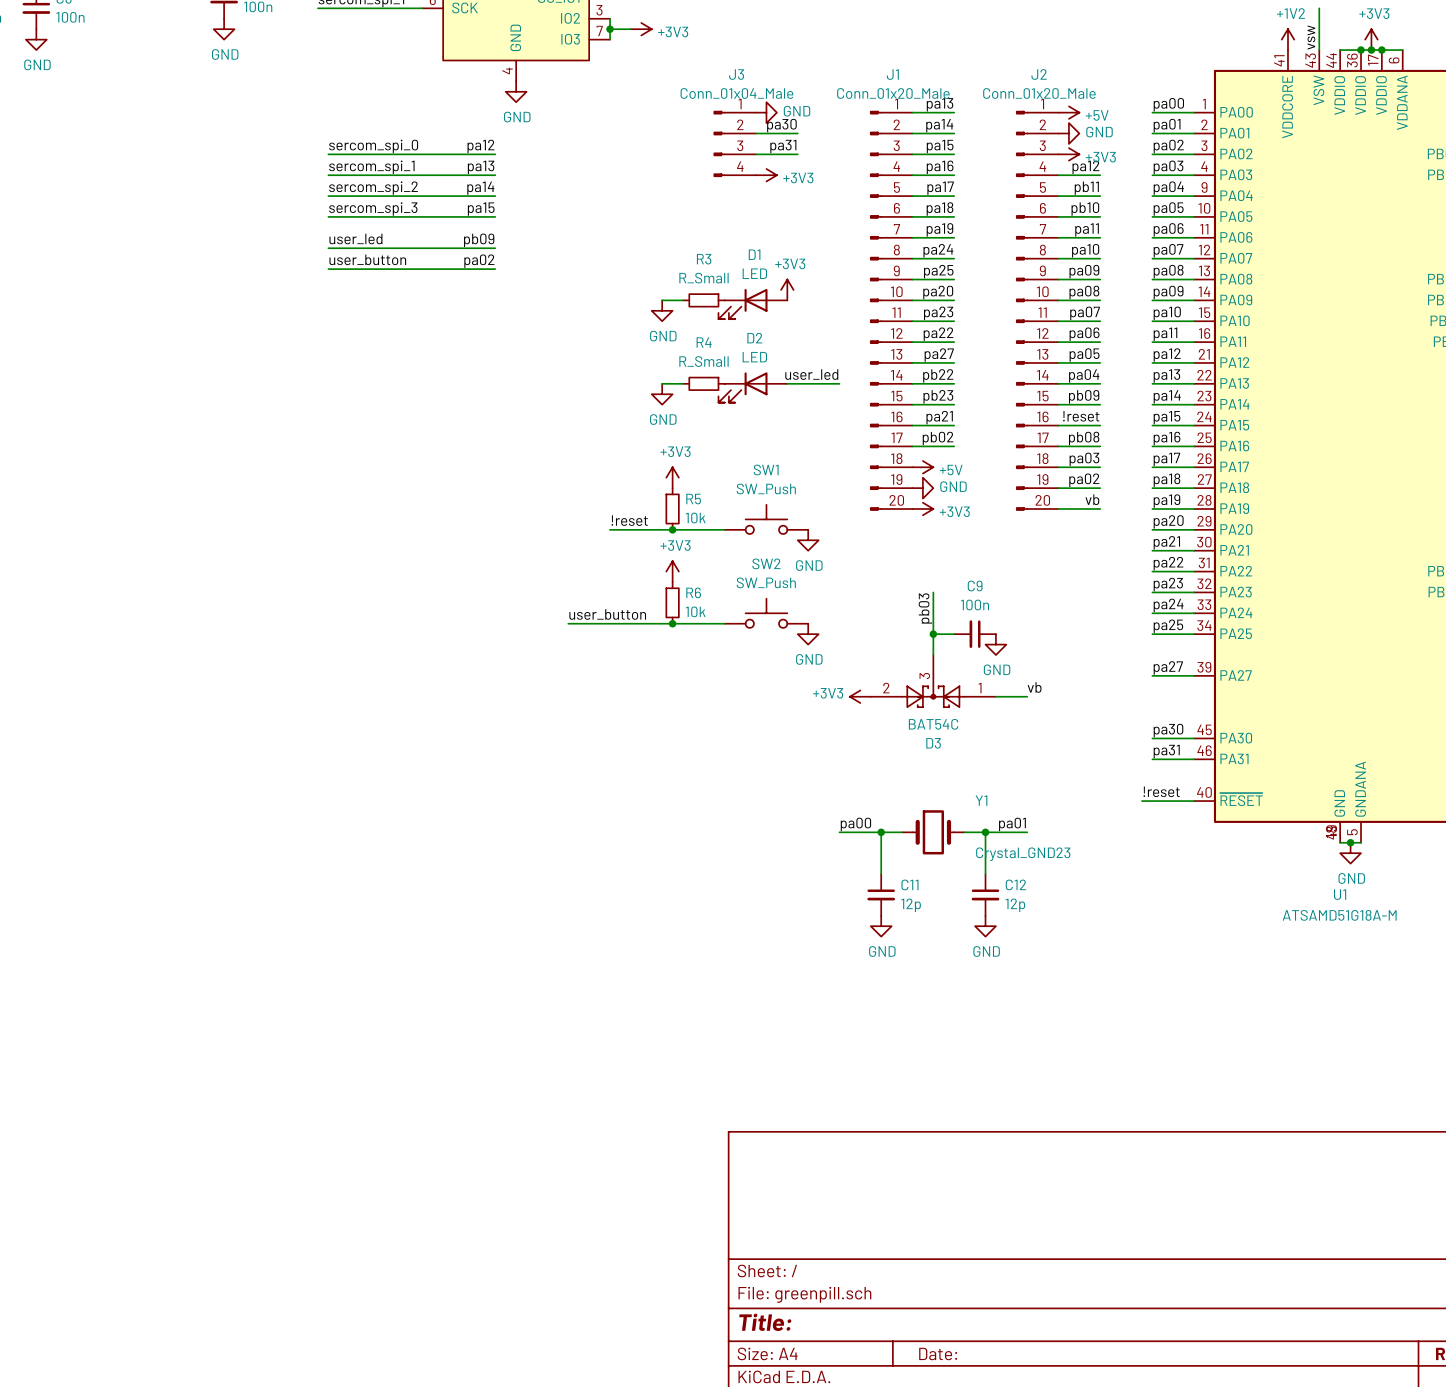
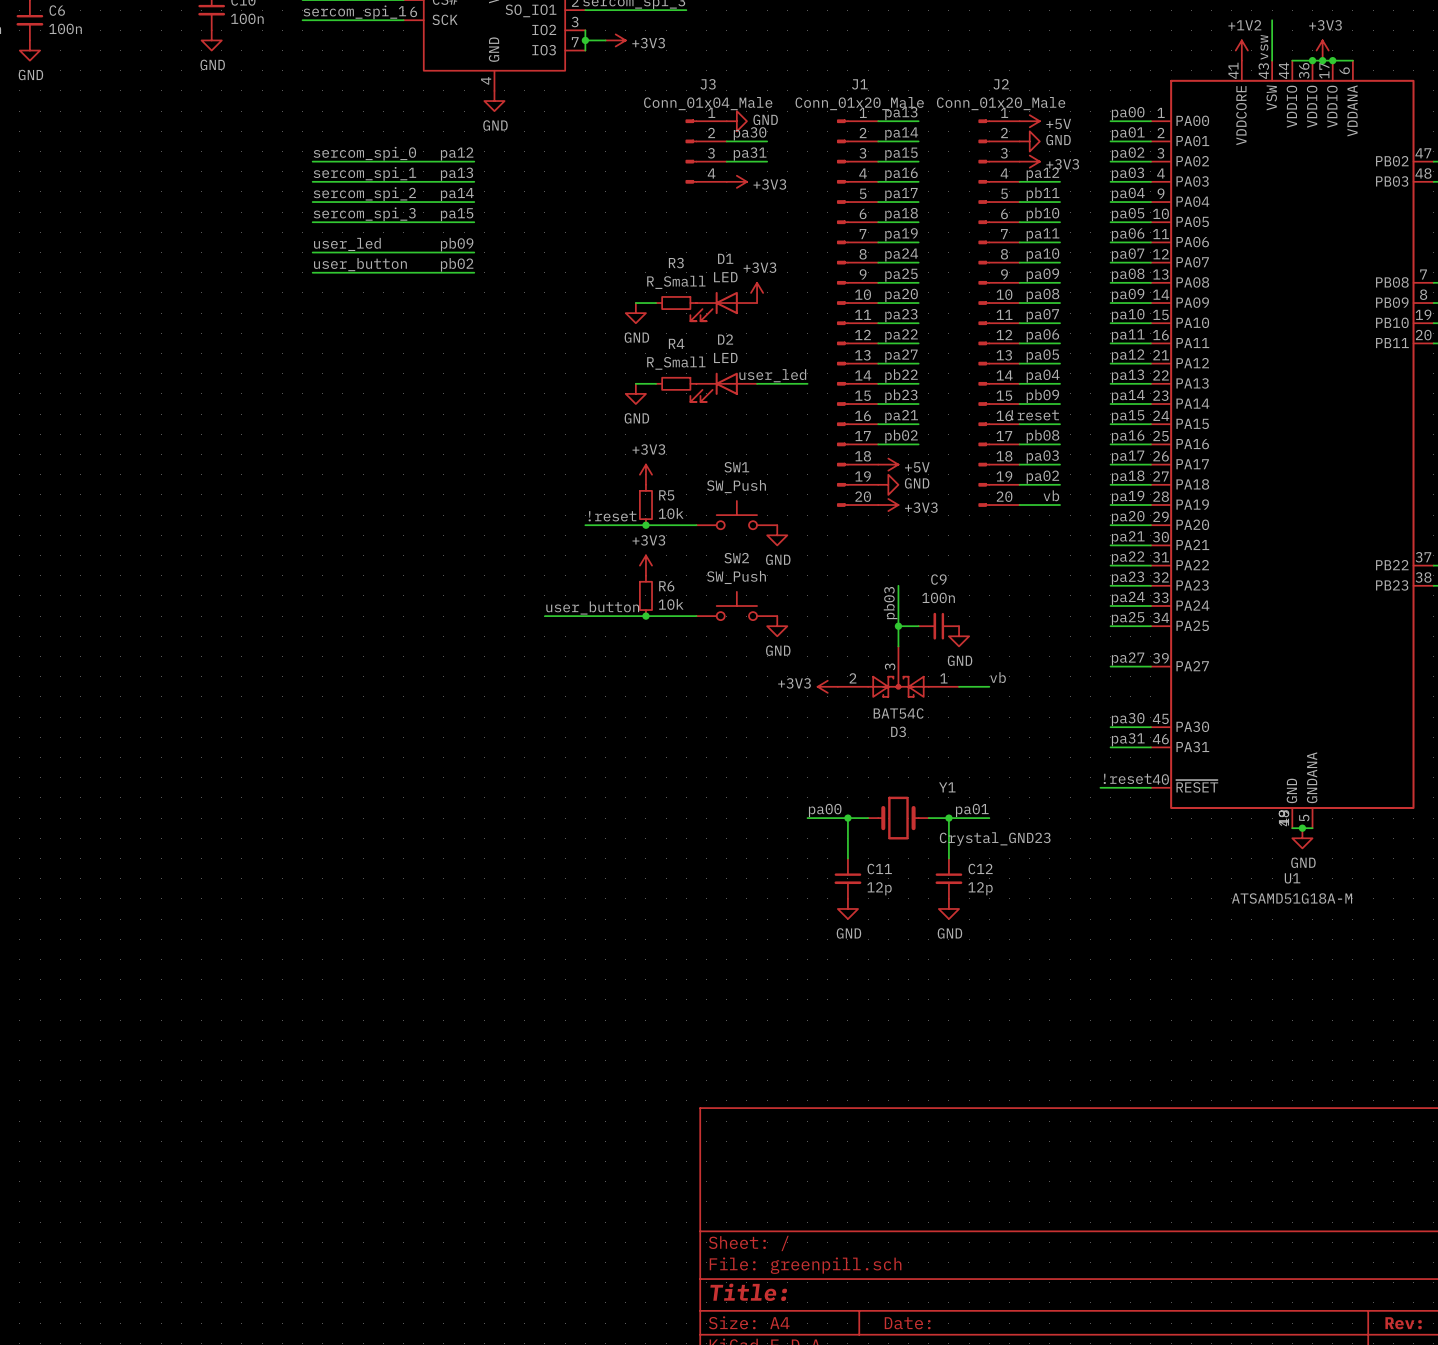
label: pa02 (479, 261) -> pb02 (457, 264)

